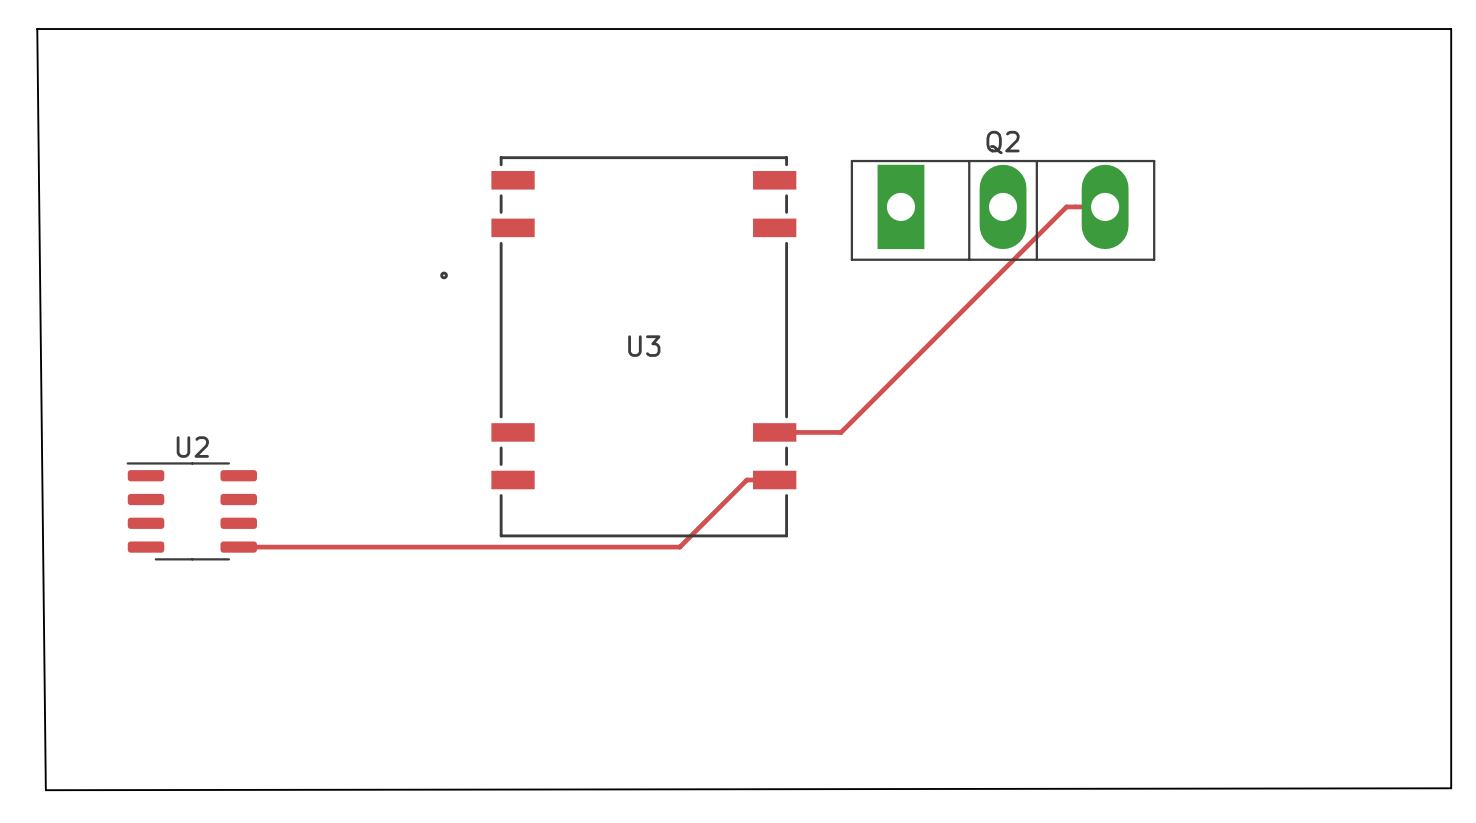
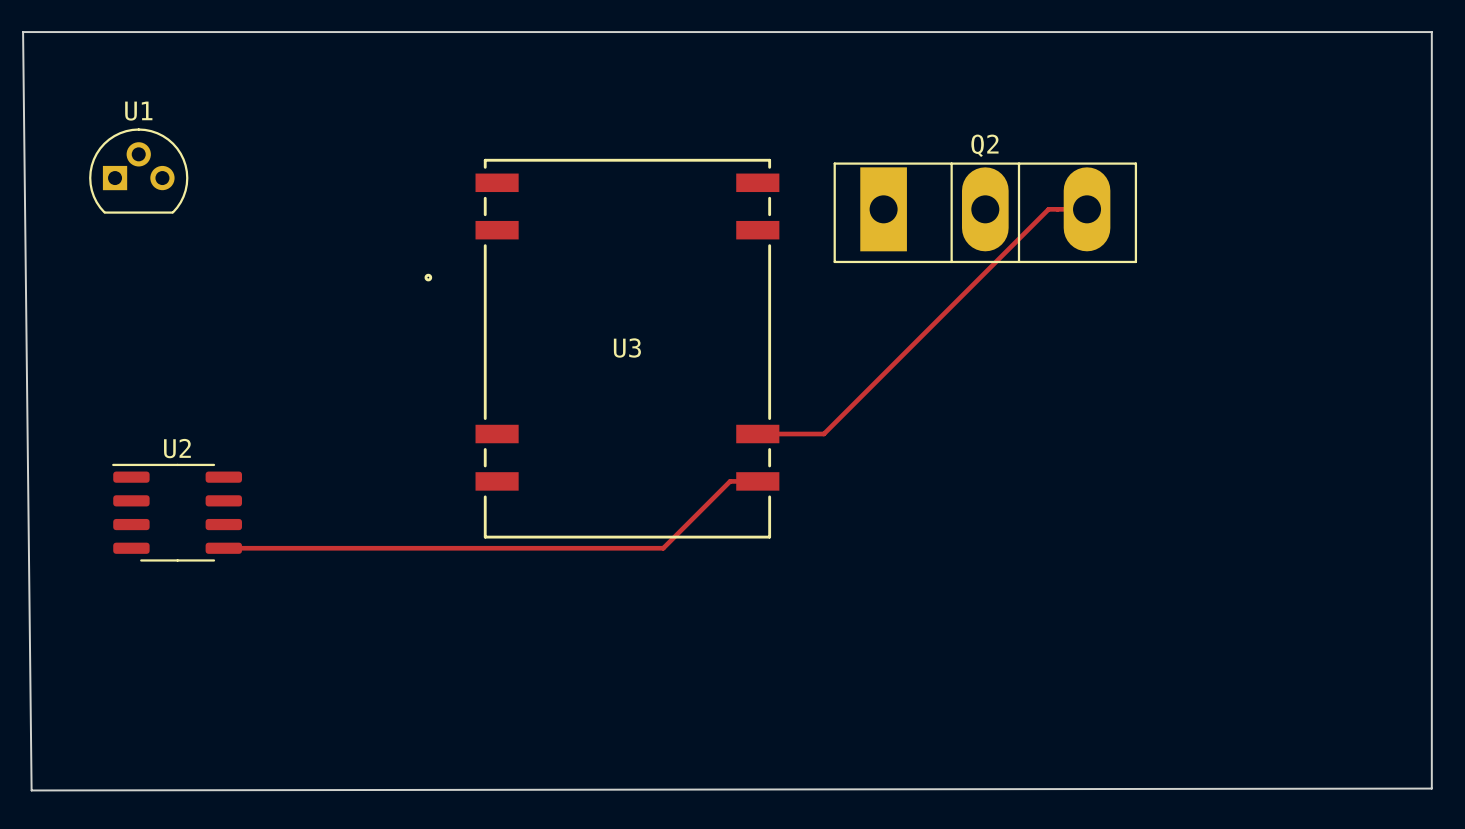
U1: none -> (138, 171)

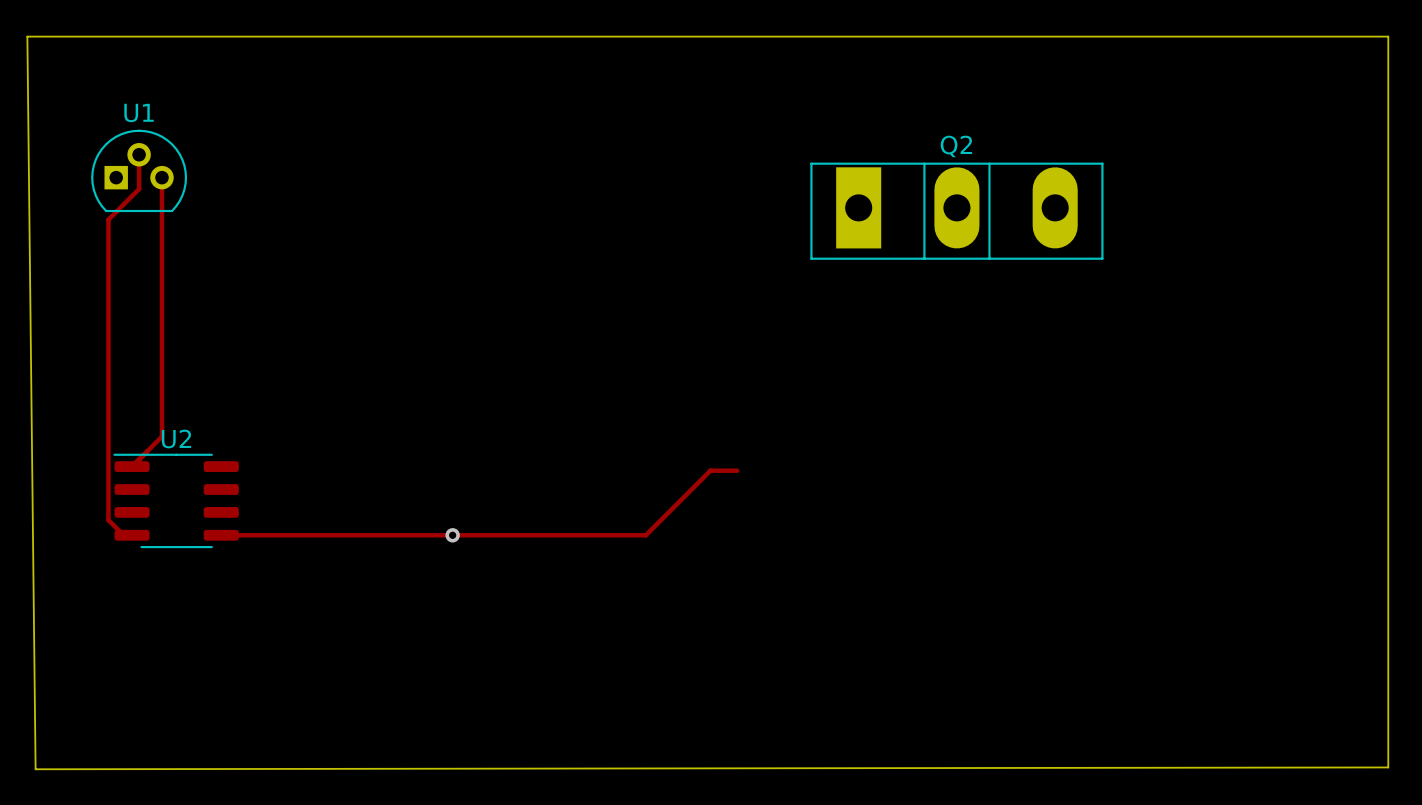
track: none -> (139, 154) (139, 189) (108, 219) (108, 520) (123, 535) (132, 535)
track: none -> (162, 177) (162, 436) (132, 466) (147, 451)
track: (1087, 209) (1048, 209) (823, 434) (757, 434) -> none
U3: (601, 348) -> none
via: none -> (452, 535)

